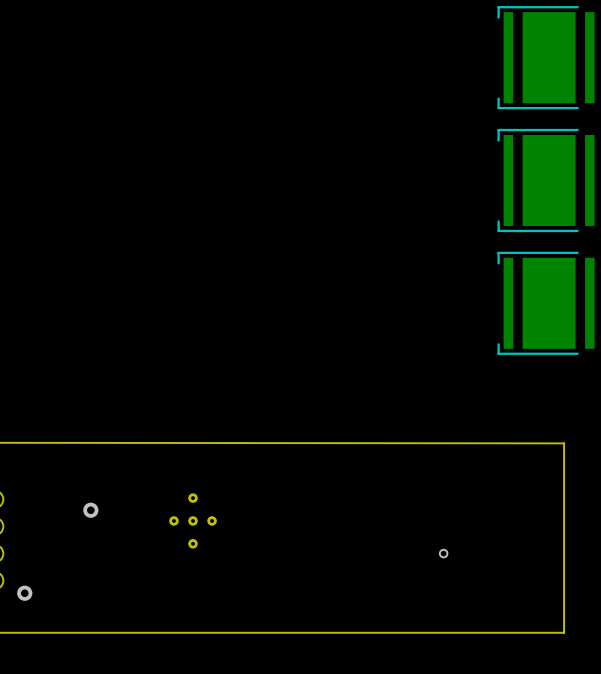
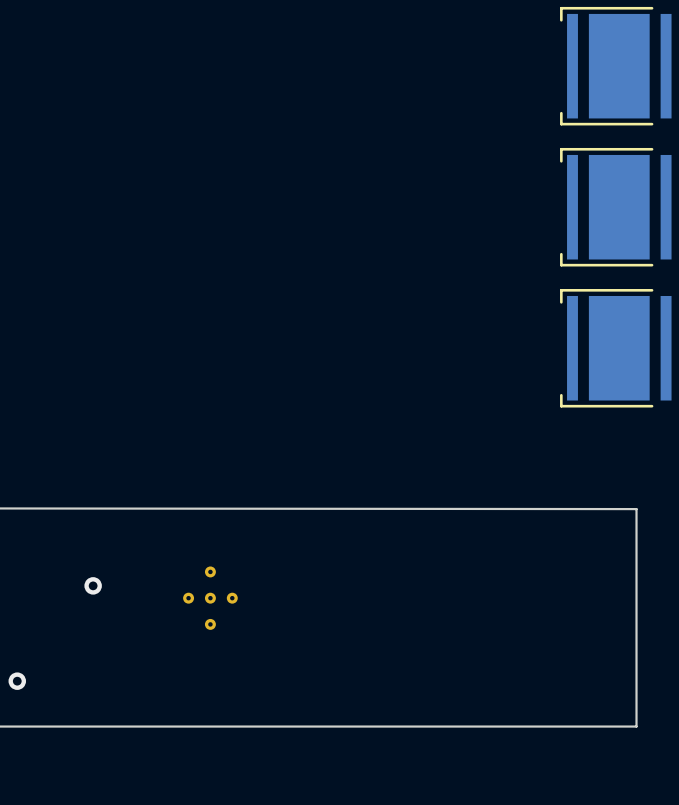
via: (443, 553) -> none

